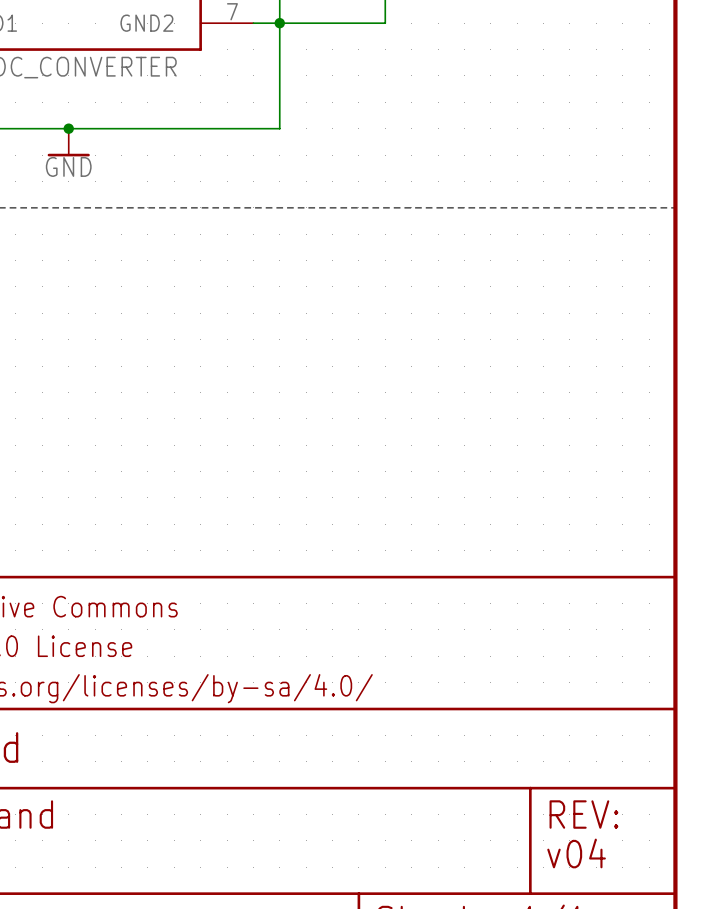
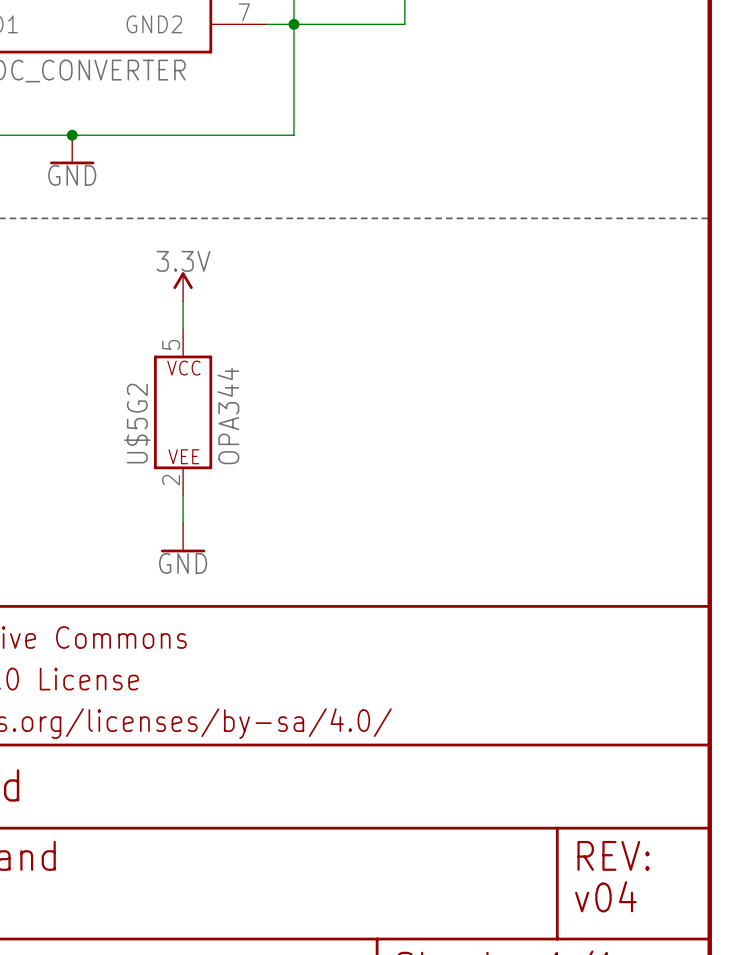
power symbol: none -> 3.3V (183, 286)
wire: none -> (183, 301) (183, 329)
U$5G2: none -> OPA344 (183, 412)
wire: none -> (183, 495) (183, 523)
power symbol: none -> GND (183, 537)

